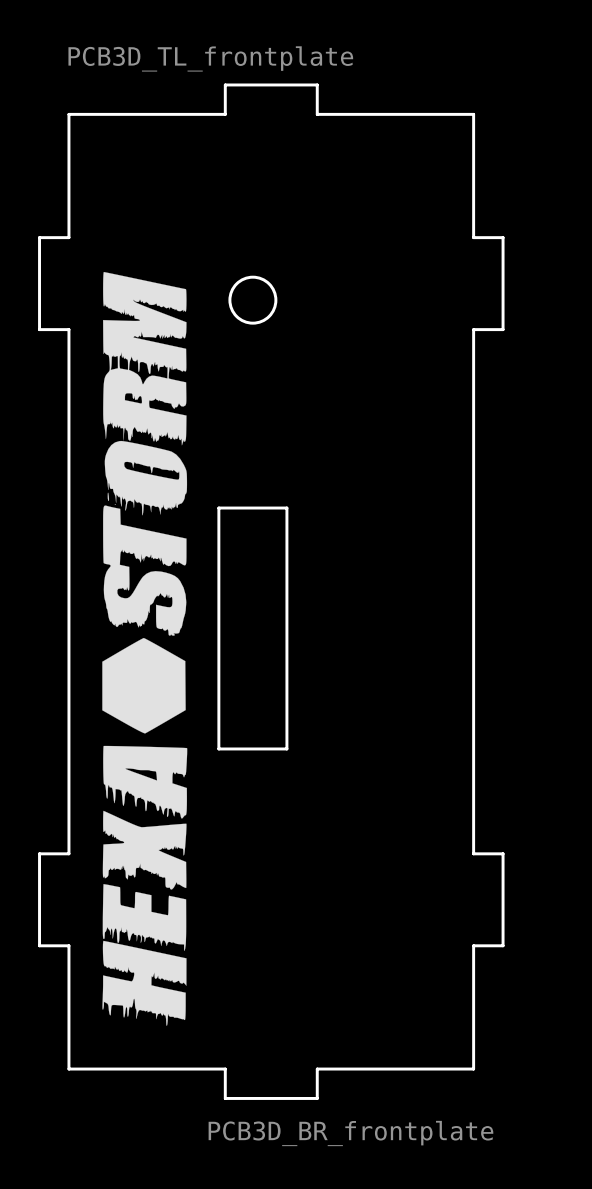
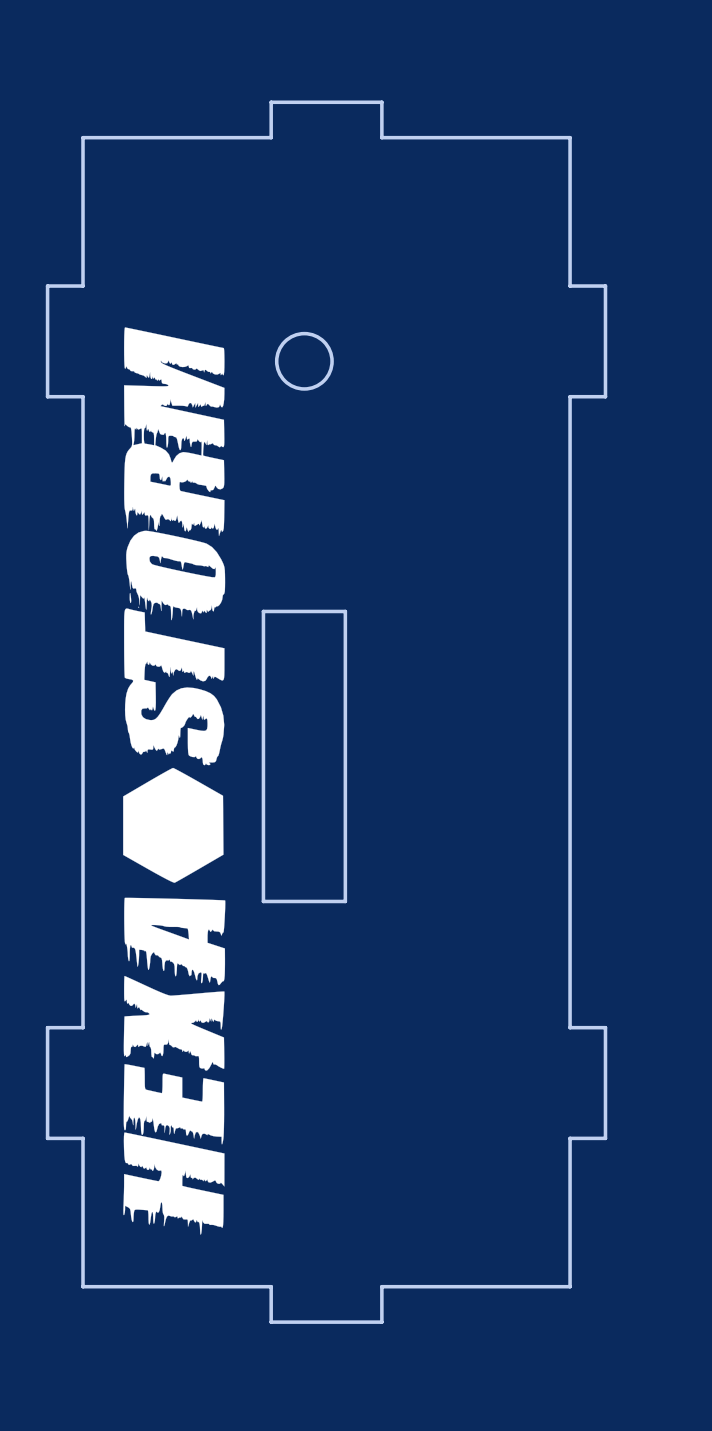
text: PCB3D_TL_frontplate (210, 58) -> none
text: PCB3D_BR_frontplate (350, 1133) -> none

